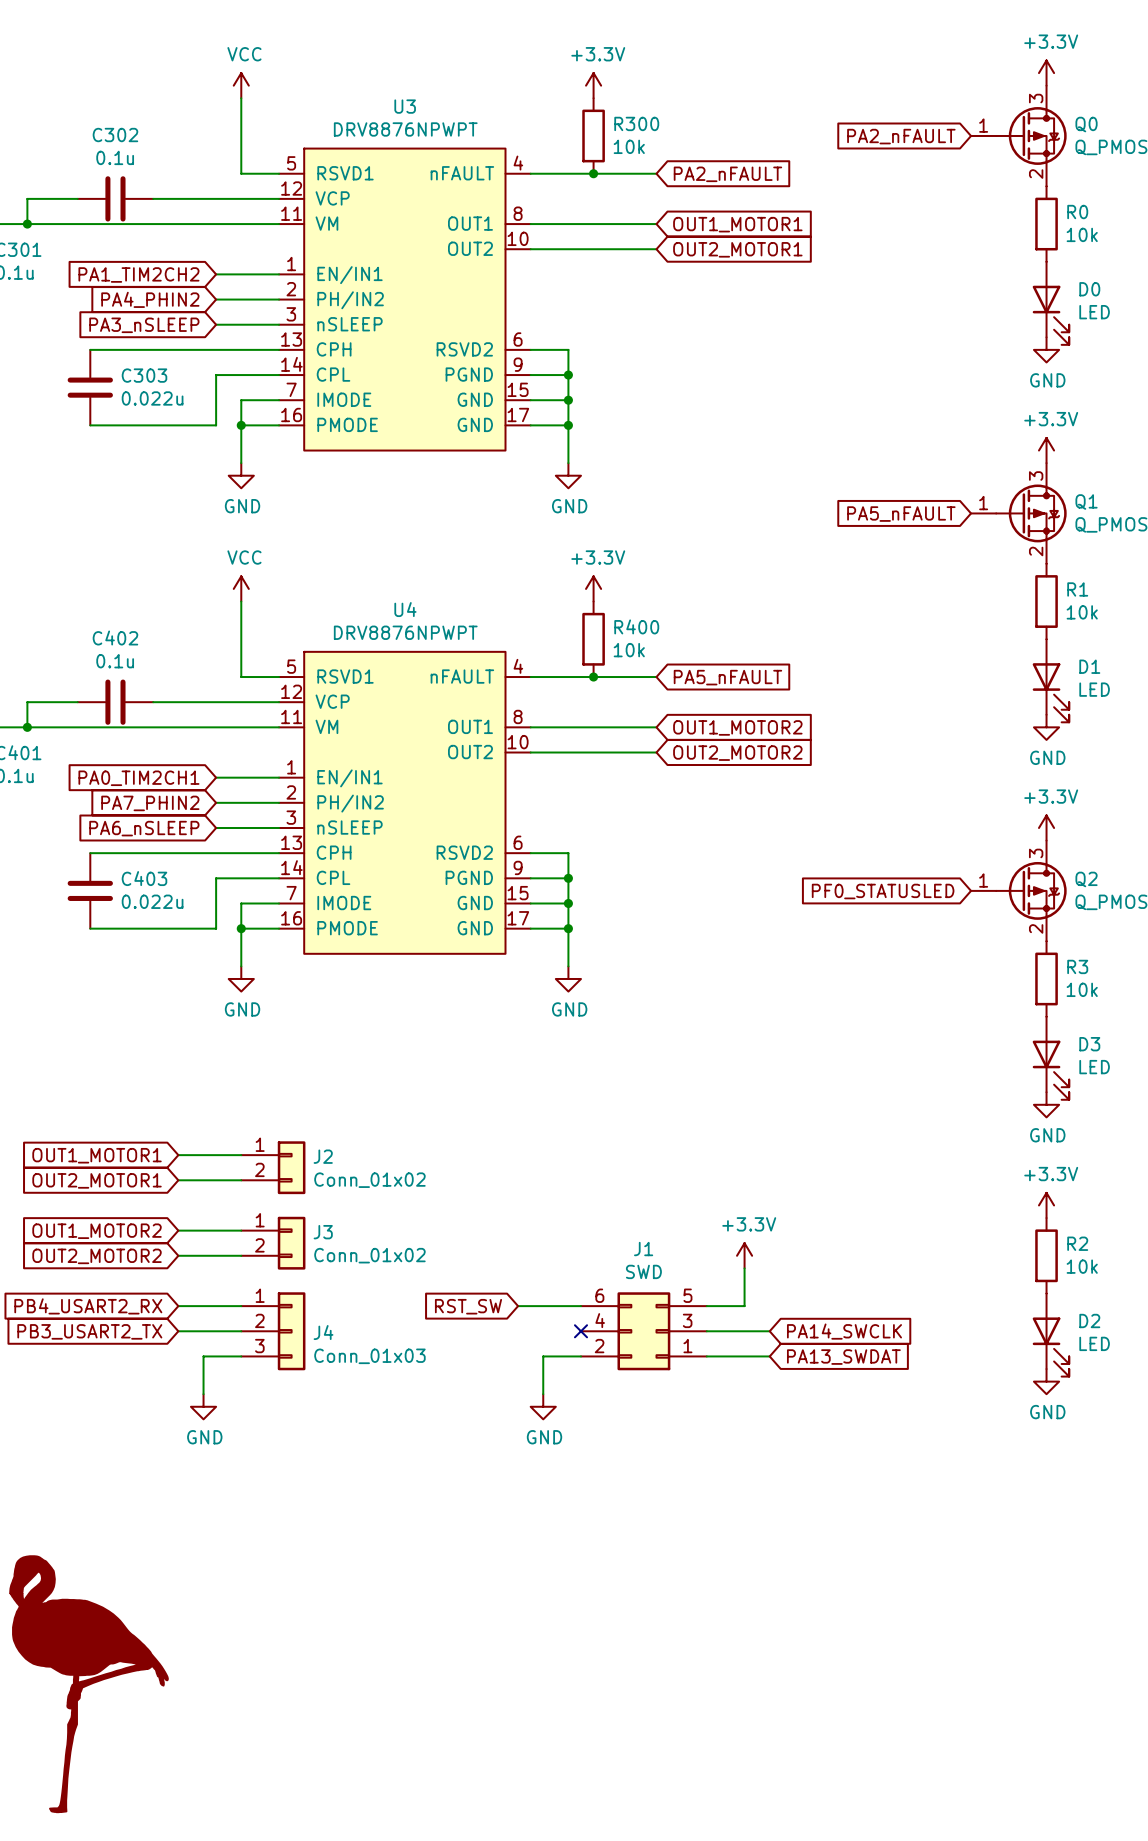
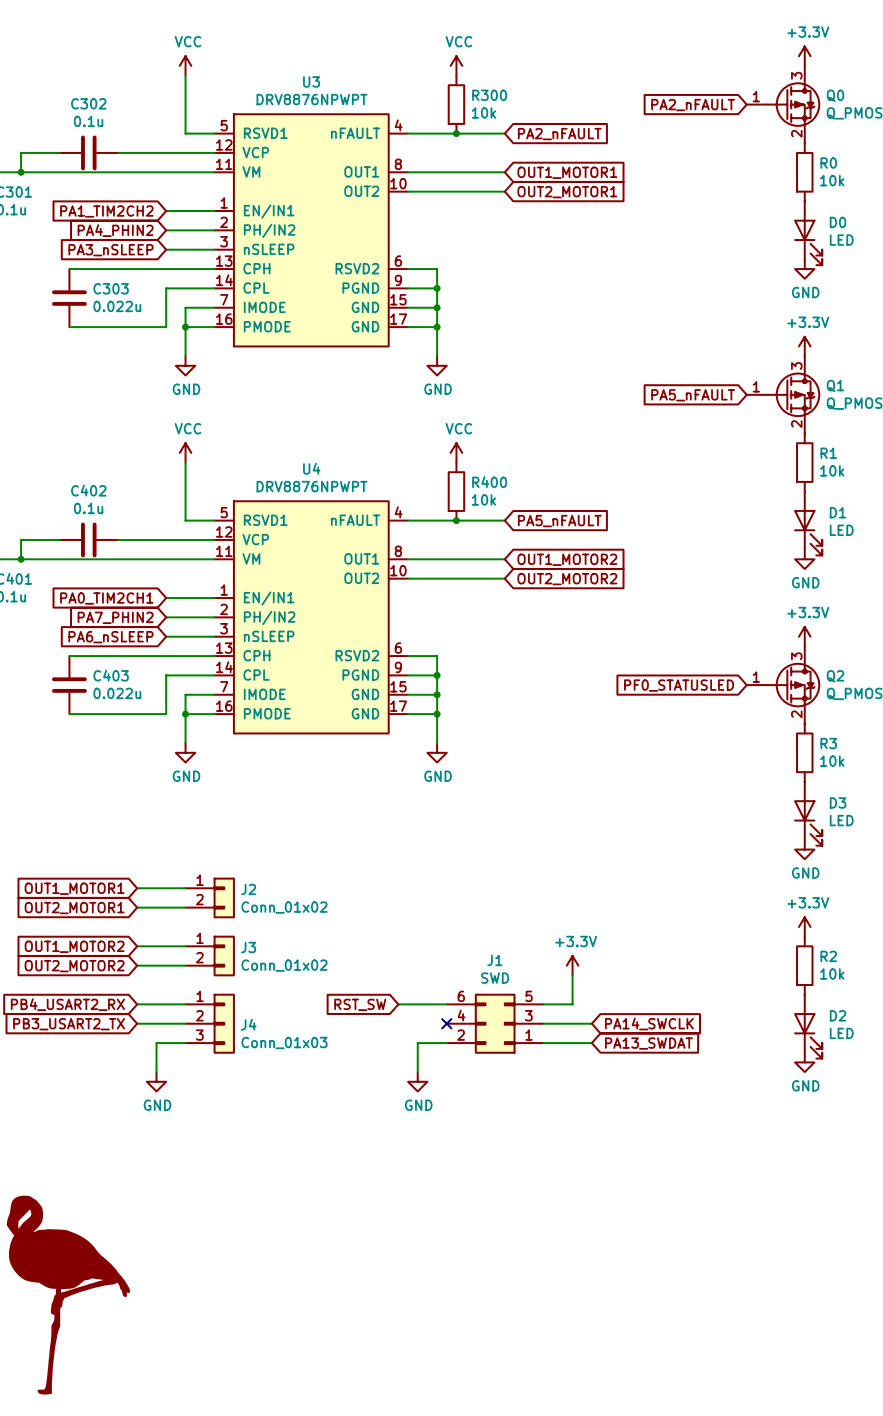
power symbol: +3.3V (593, 85) -> VCC (456, 65)
power symbol: +3.3V (593, 588) -> VCC (456, 452)

